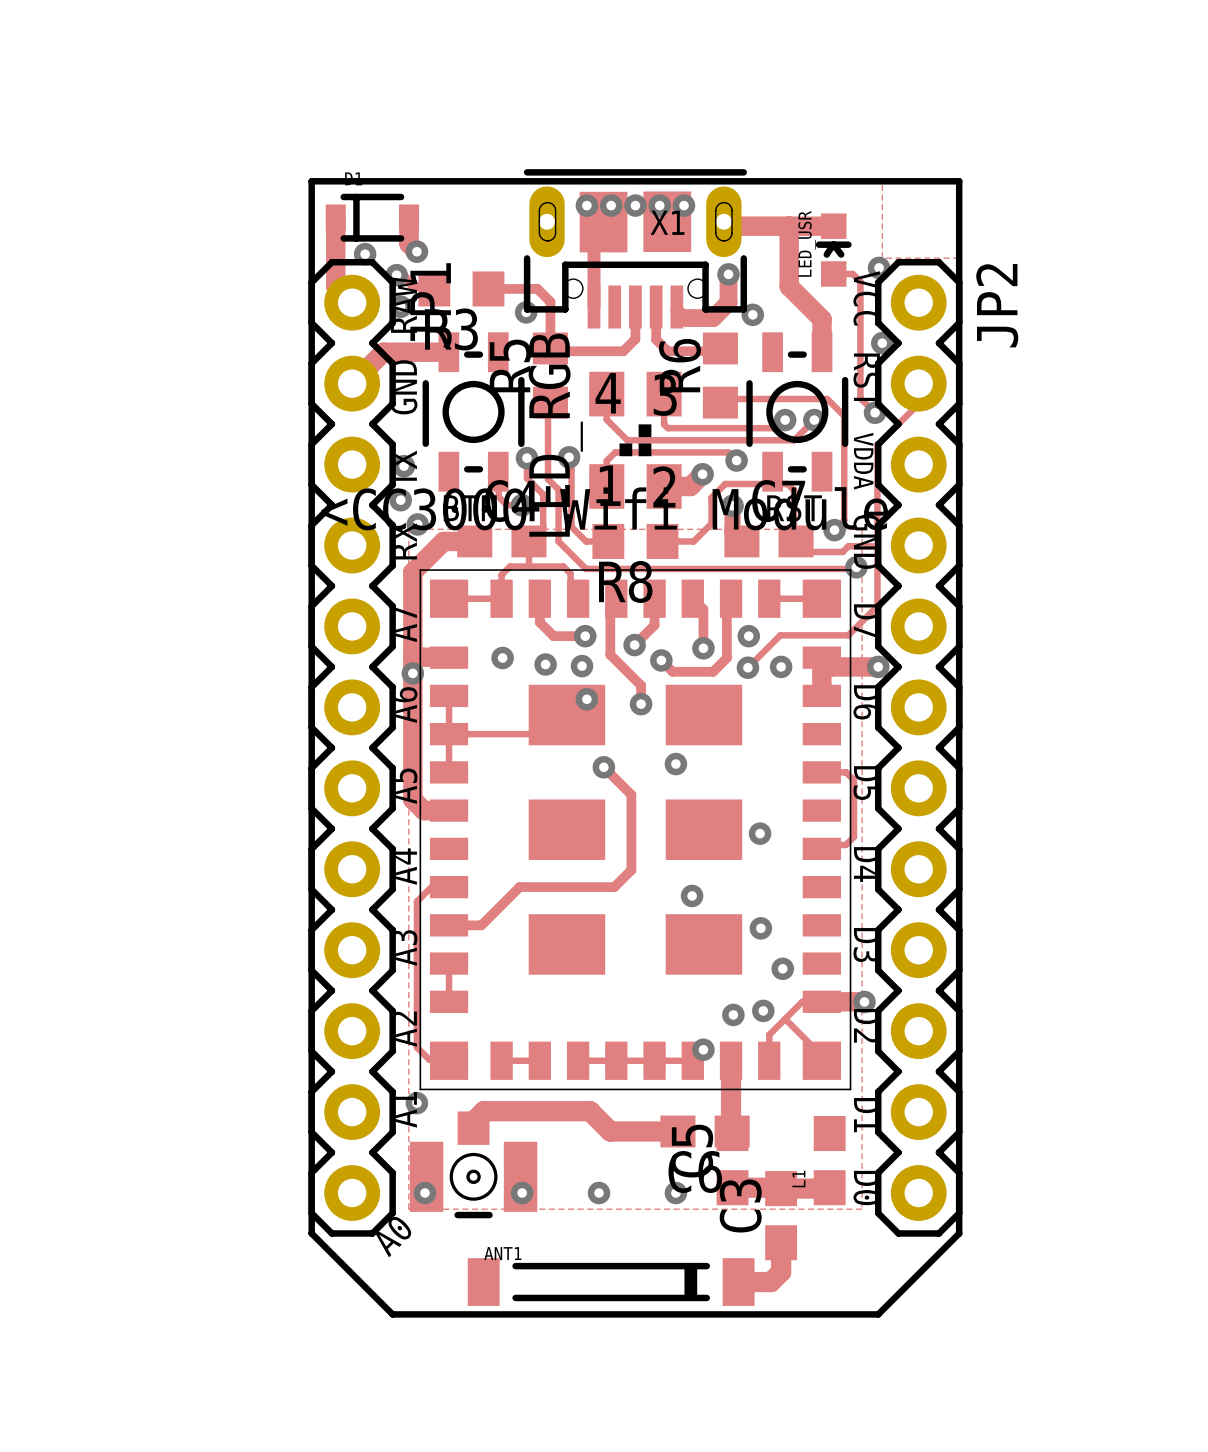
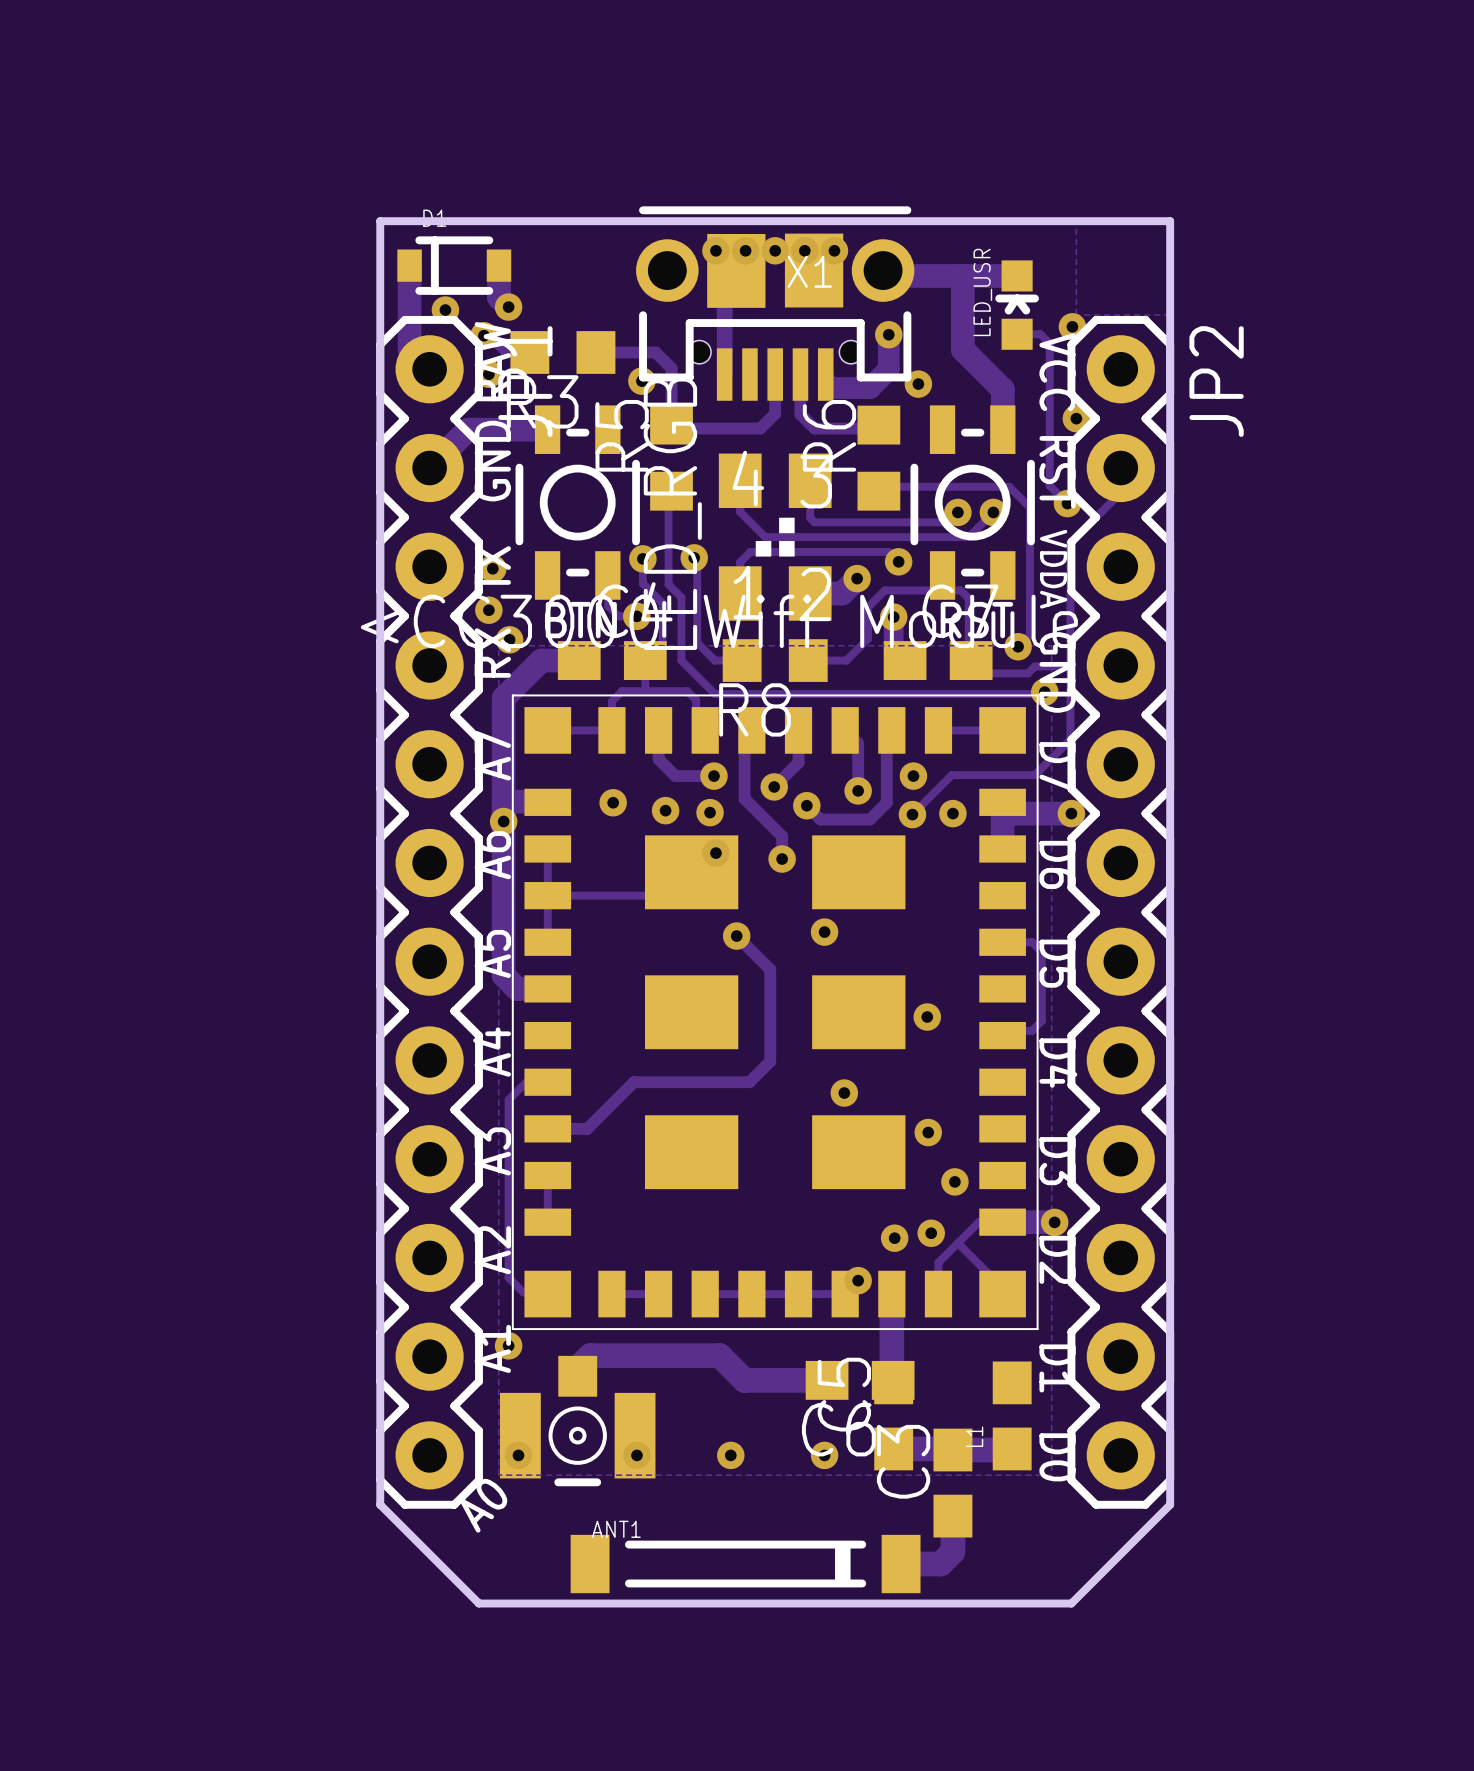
X1 footprint: [523, 169, 748, 329] -> [636, 206, 915, 401]

